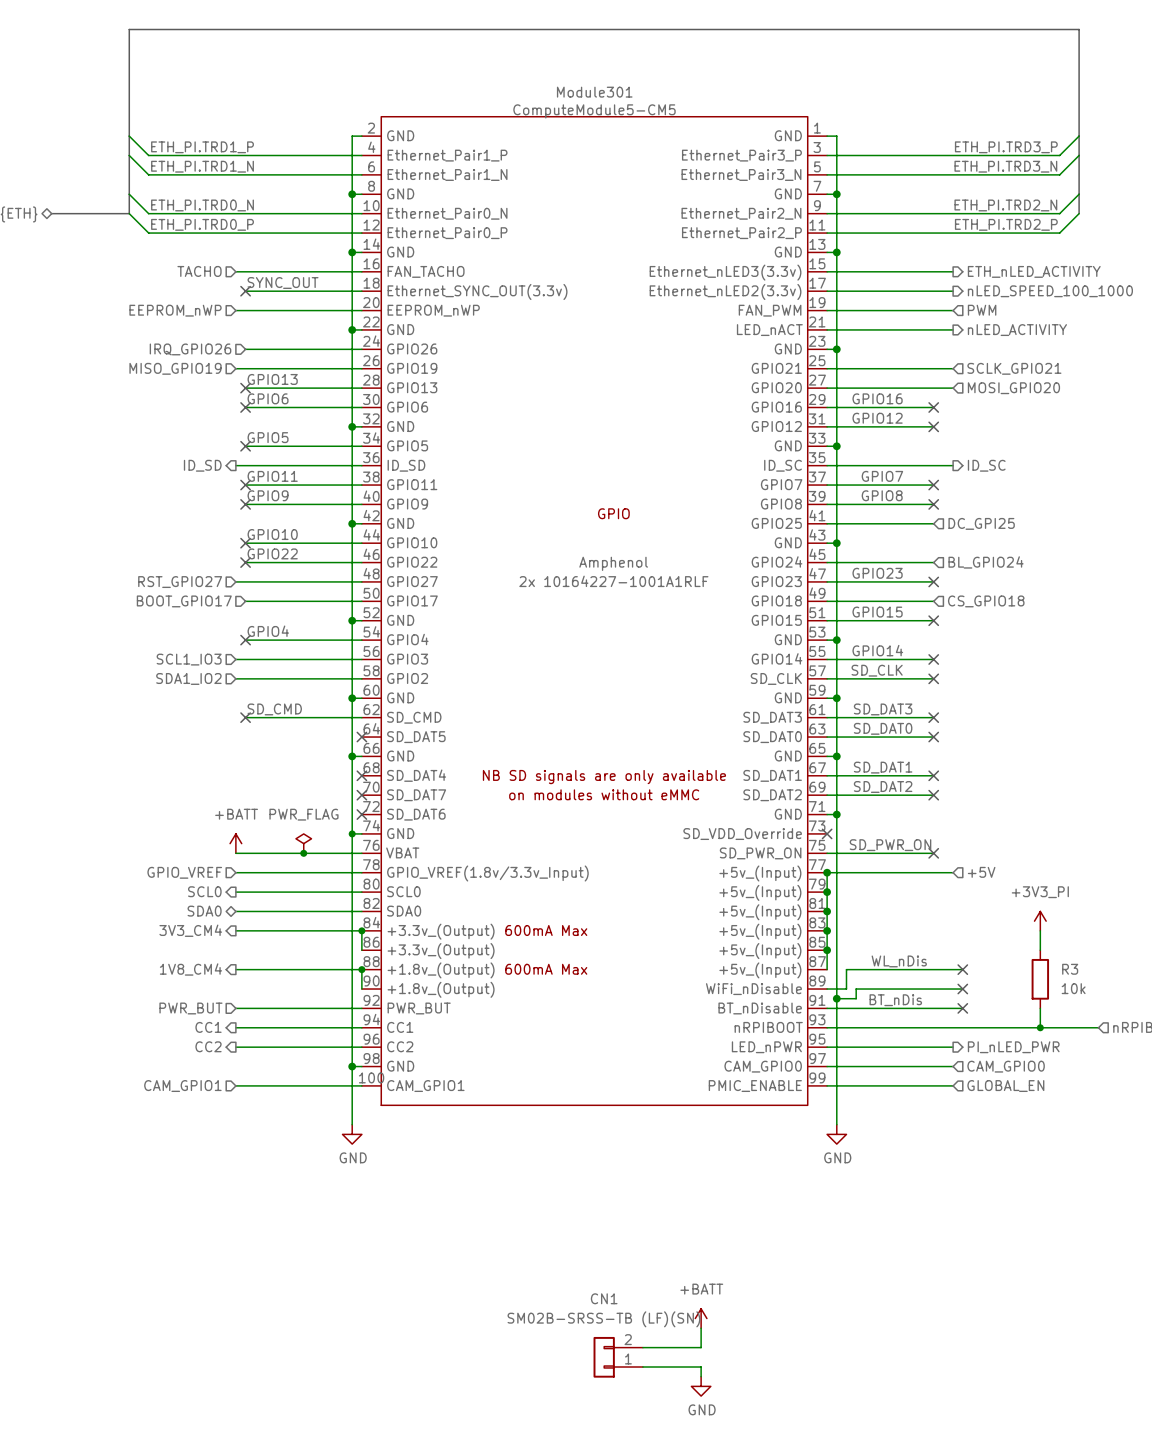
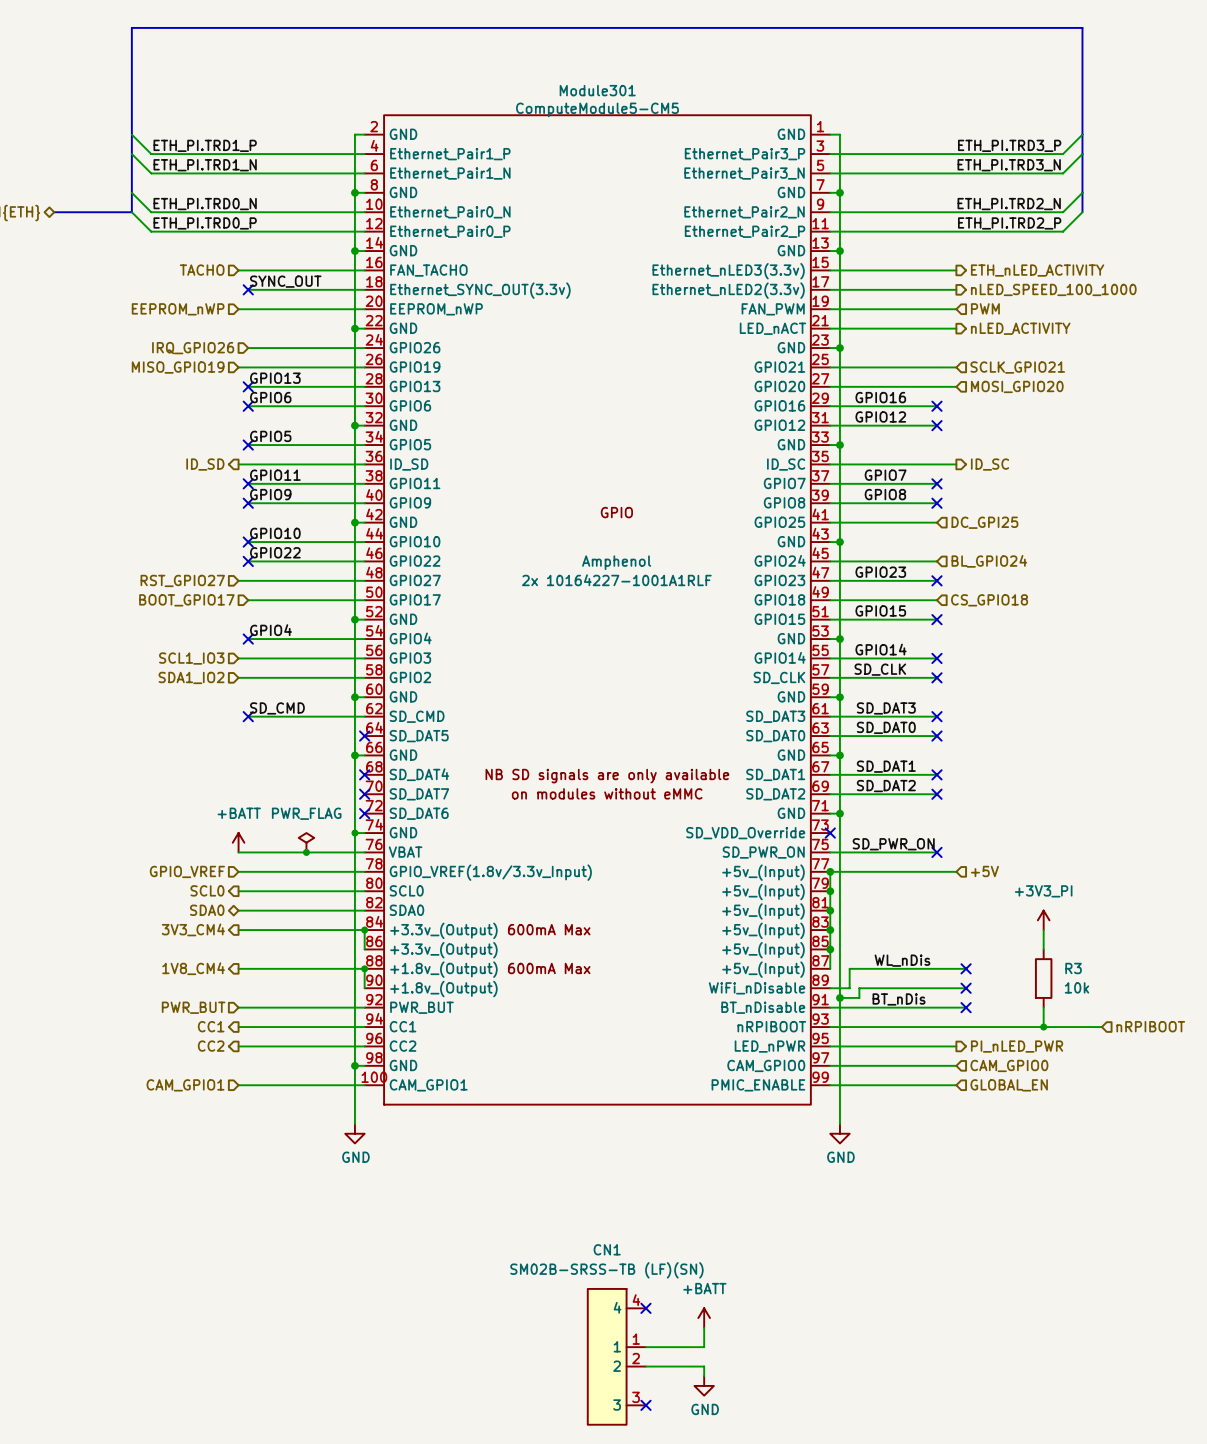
CN1 name position: CN1 (604, 1298) -> CN1 (607, 1249)
no-connect mark: none -> (645, 1308)
CN1 value position: SM02B-SRSS-TB (LF)(SN) (603, 1319) -> SM02B-SRSS-TB (LF)(SN) (606, 1270)
CN1 symbol: [593, 1336, 643, 1378] -> [587, 1288, 646, 1425]
no-connect mark: none -> (645, 1405)

